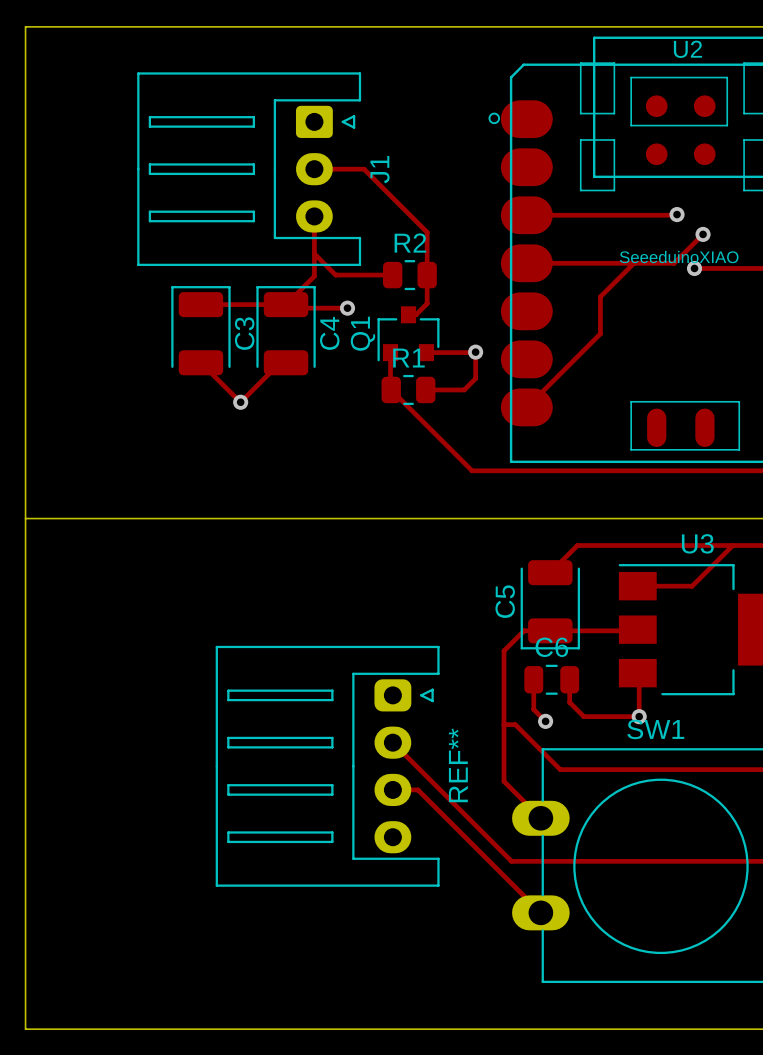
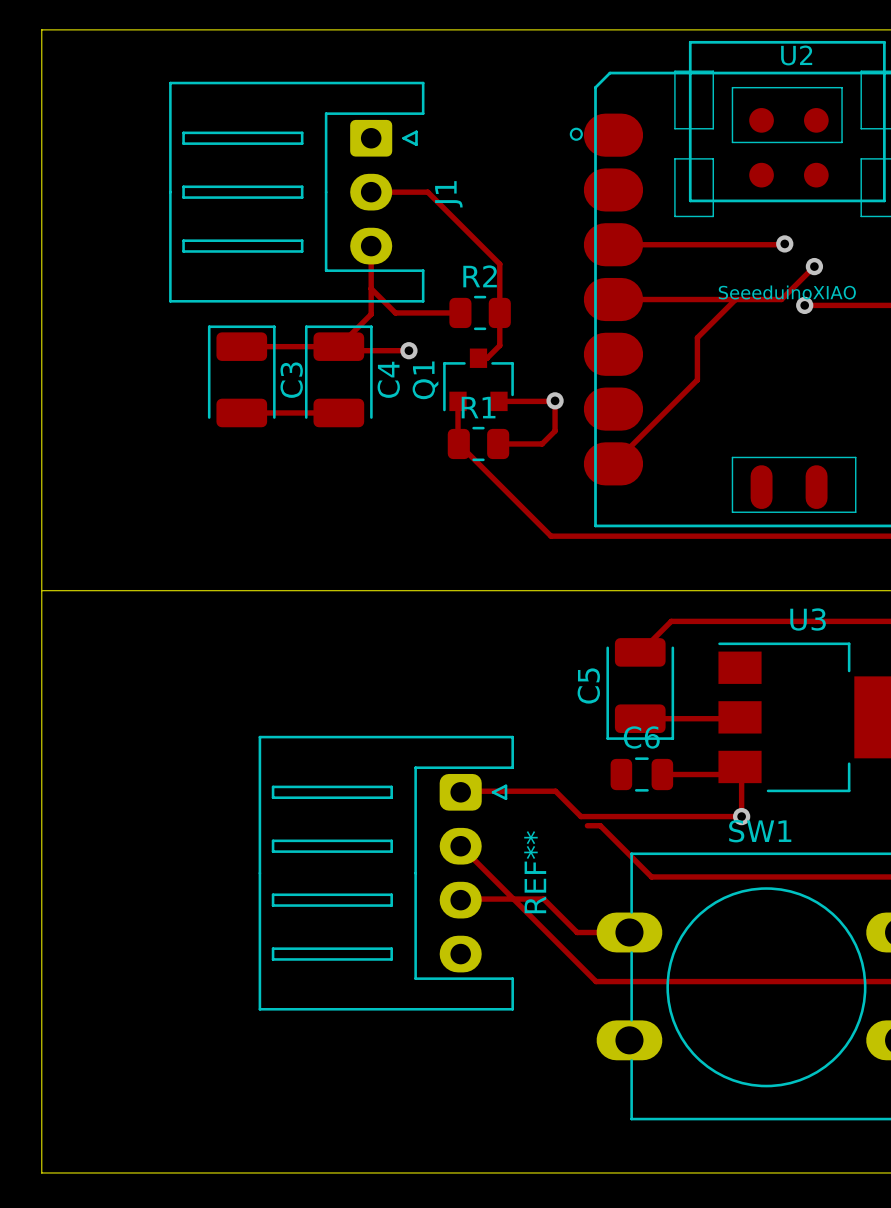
track: (200, 362) (240, 402) -> (241, 412) (332, 412)
track: (280, 362) (240, 402) -> none
via: (240, 402) -> none
track: (732, 545) (692, 586) (637, 586) -> none
track: (550, 630) (524, 630) (503, 650) (503, 781) (540, 818) -> (479, 899) (543, 899) (577, 932) (629, 932)
track: (533, 679) (533, 709) (545, 721) -> none
track: (569, 679) (569, 702) (583, 716) -> (662, 774) (732, 774)
track: none -> (479, 791) (555, 791) (580, 816) (678, 816)
via: (545, 721) -> none
track: (392, 789) (417, 789) (540, 912) -> none

